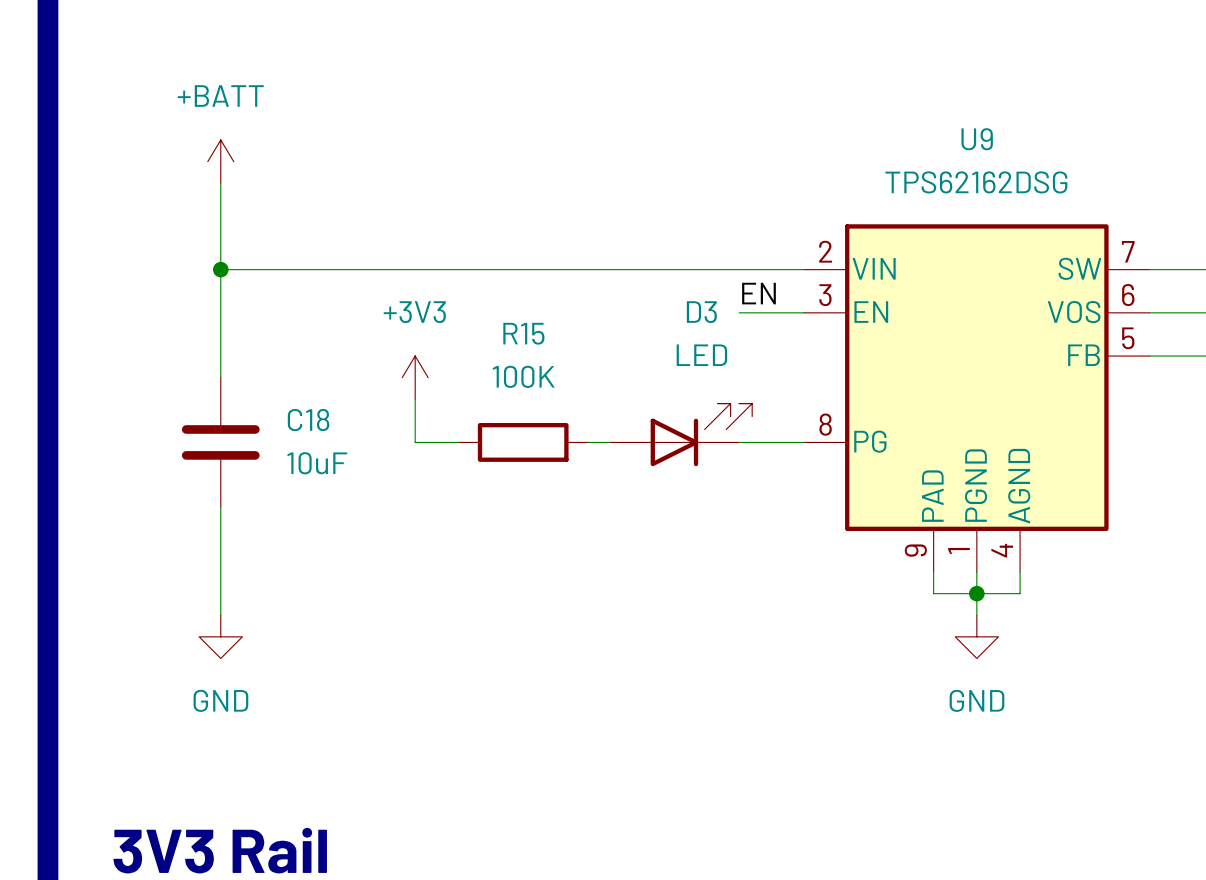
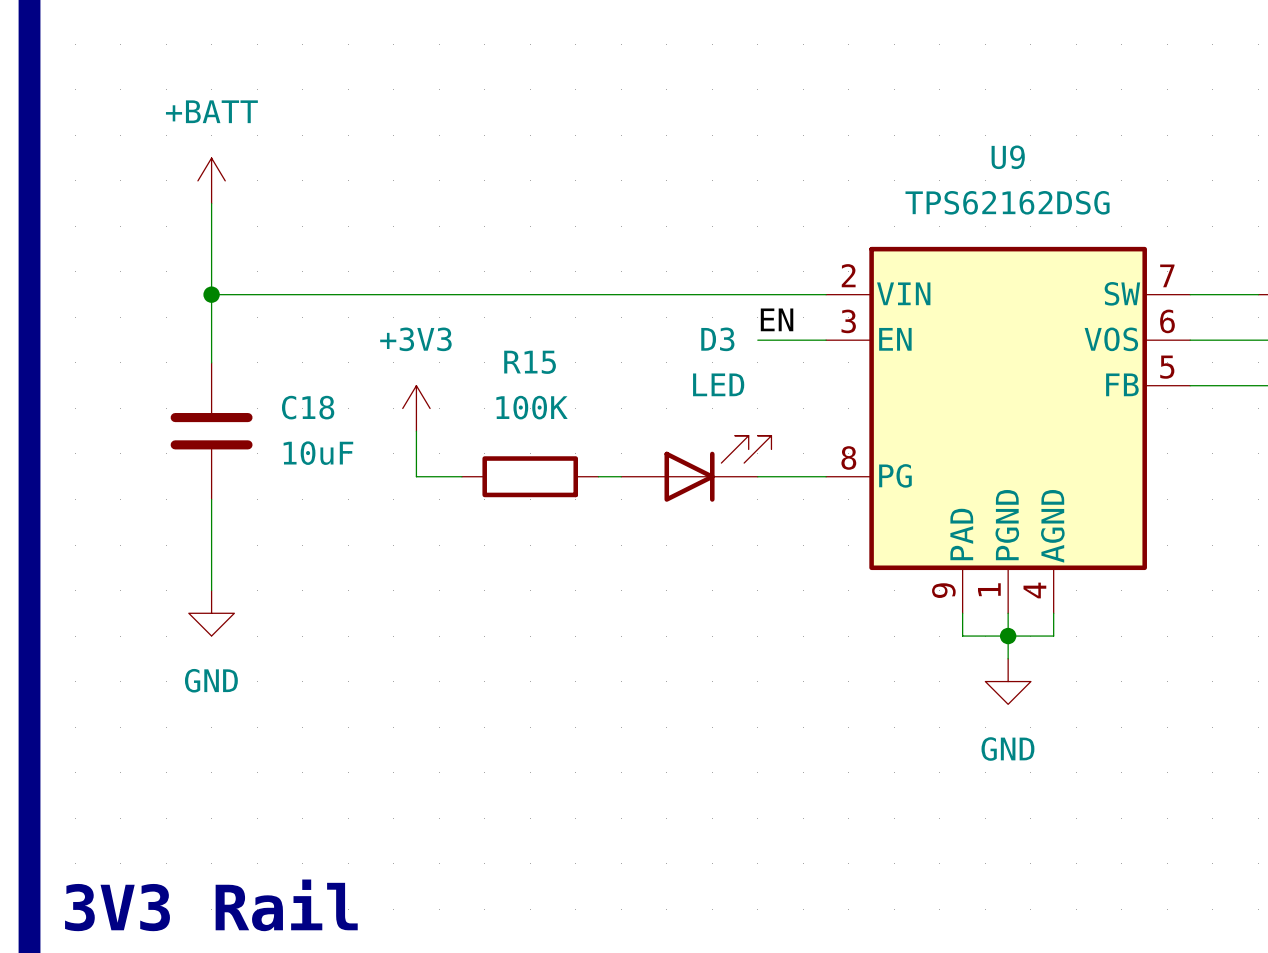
C18 position: (220, 442) -> (211, 431)
wire: (220, 550) (220, 615) -> none
power symbol position: GND (220, 636) -> GND (211, 613)

